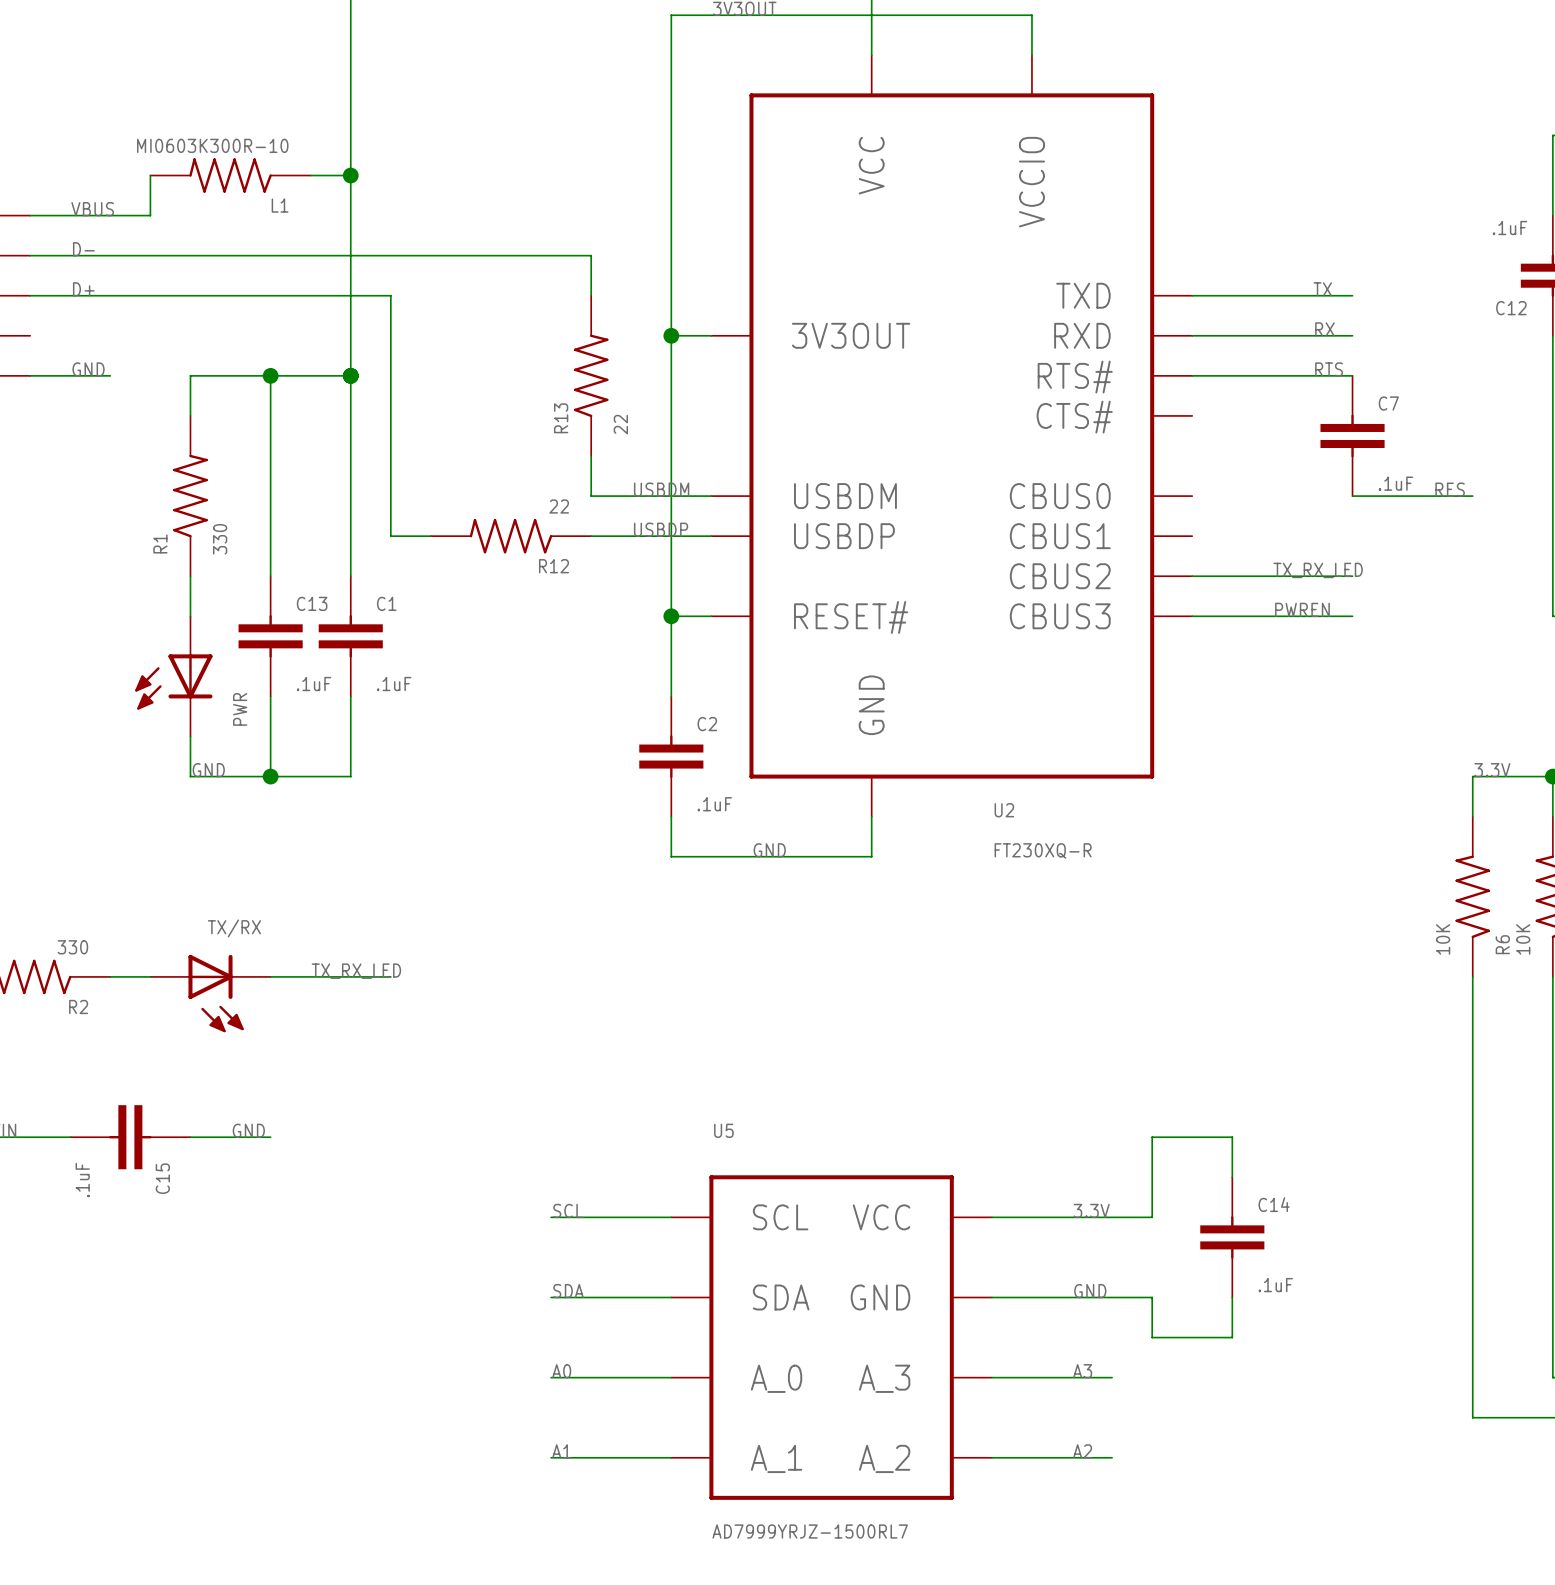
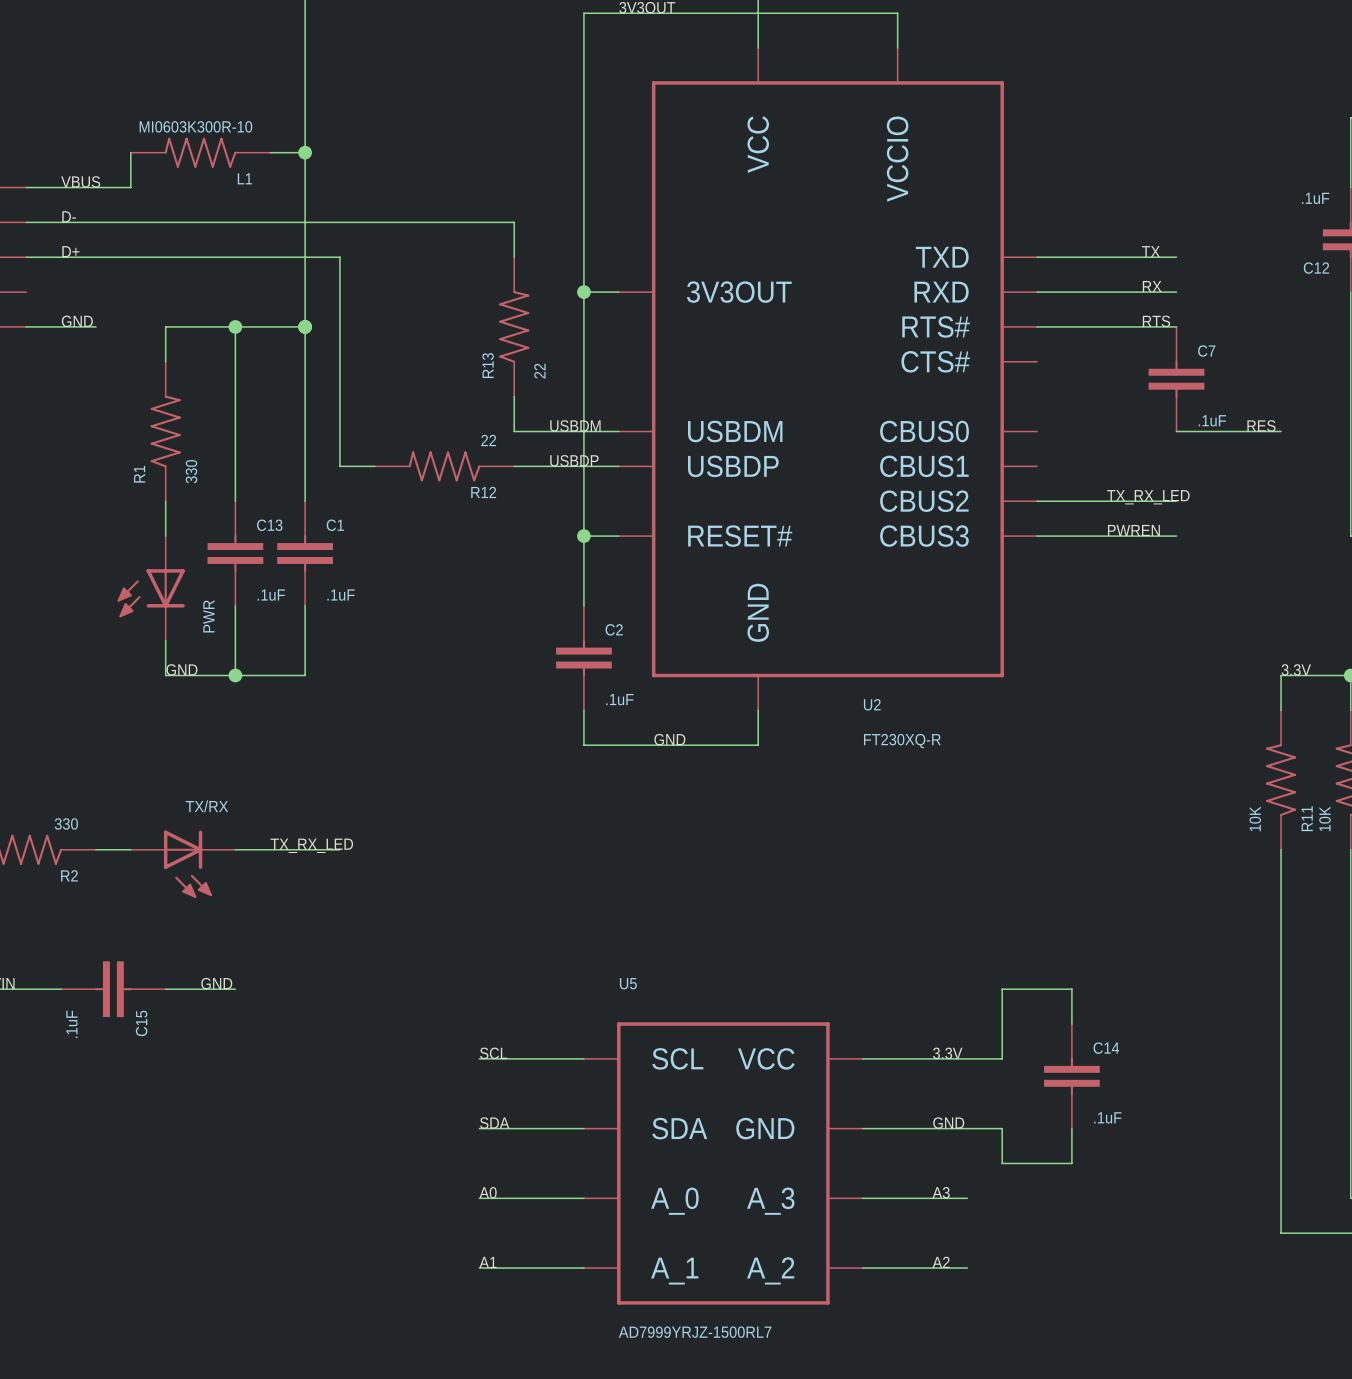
R6 name: R6 (1502, 944) -> R11 (1307, 818)

